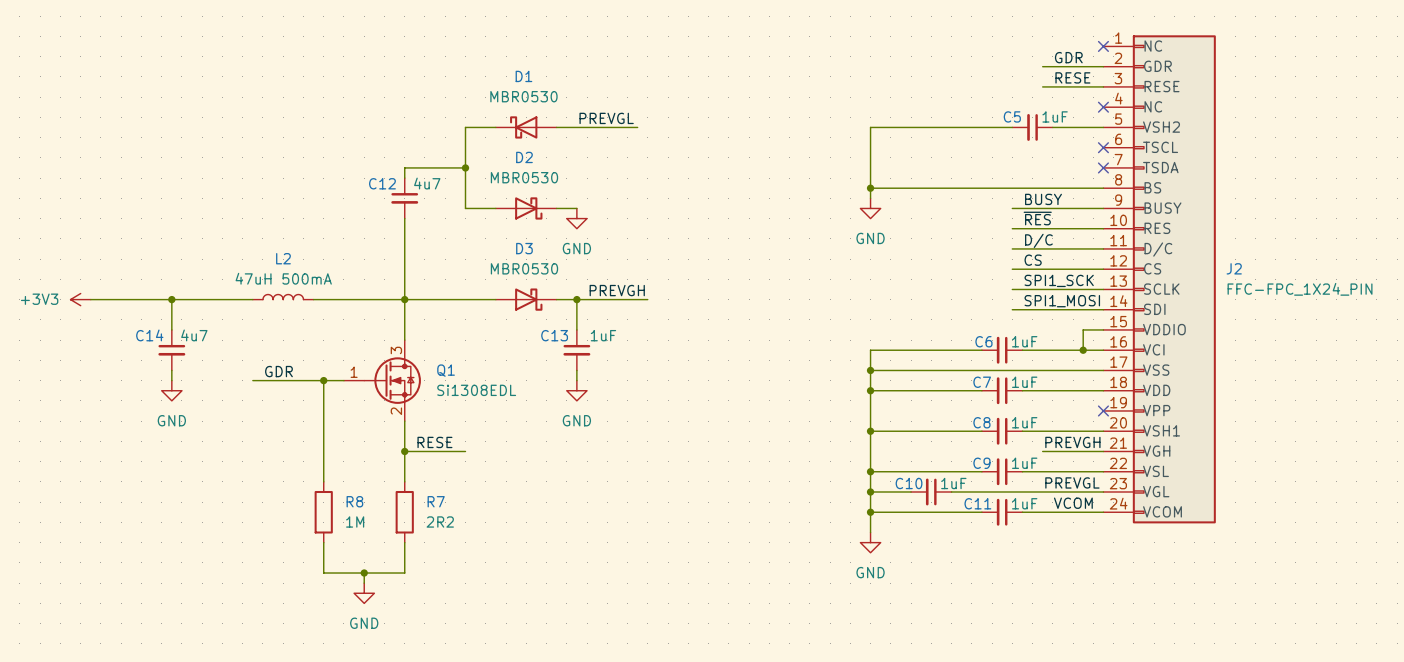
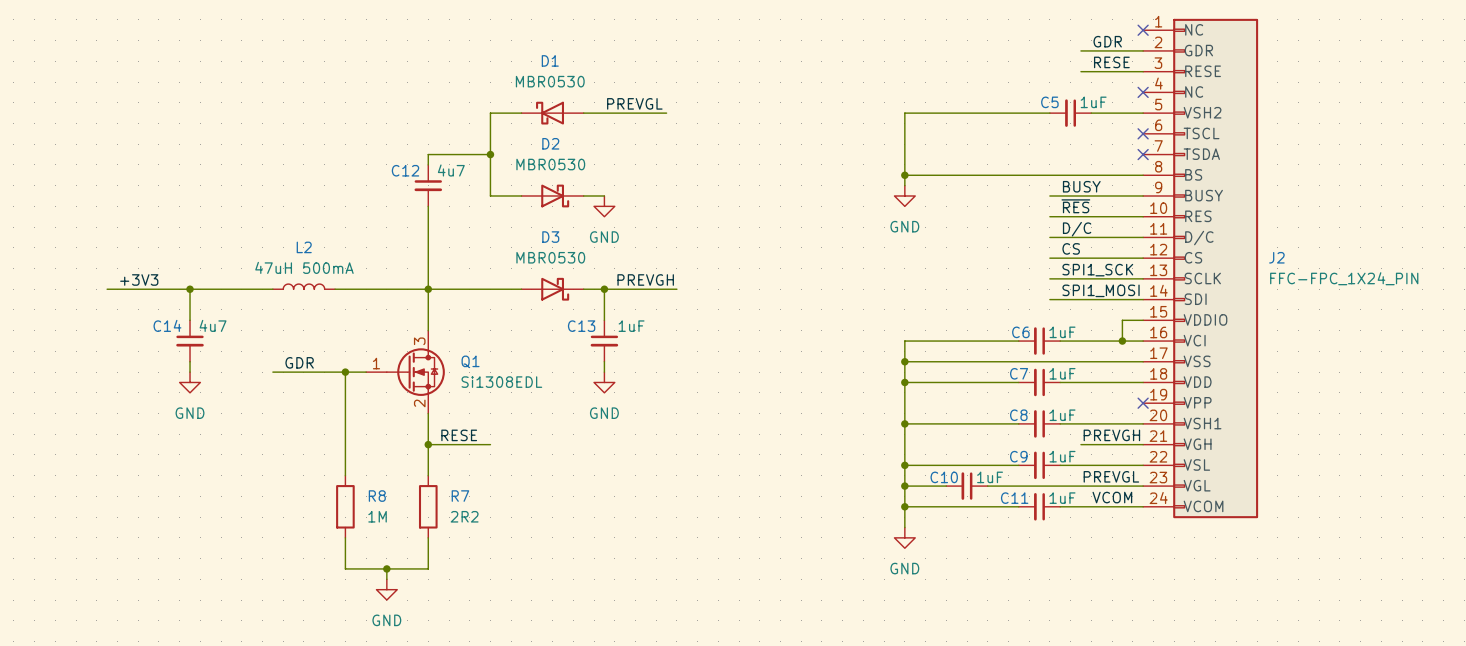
label: none -> +3V3 (139, 279)
power symbol: +3V3 (80, 299) -> none

